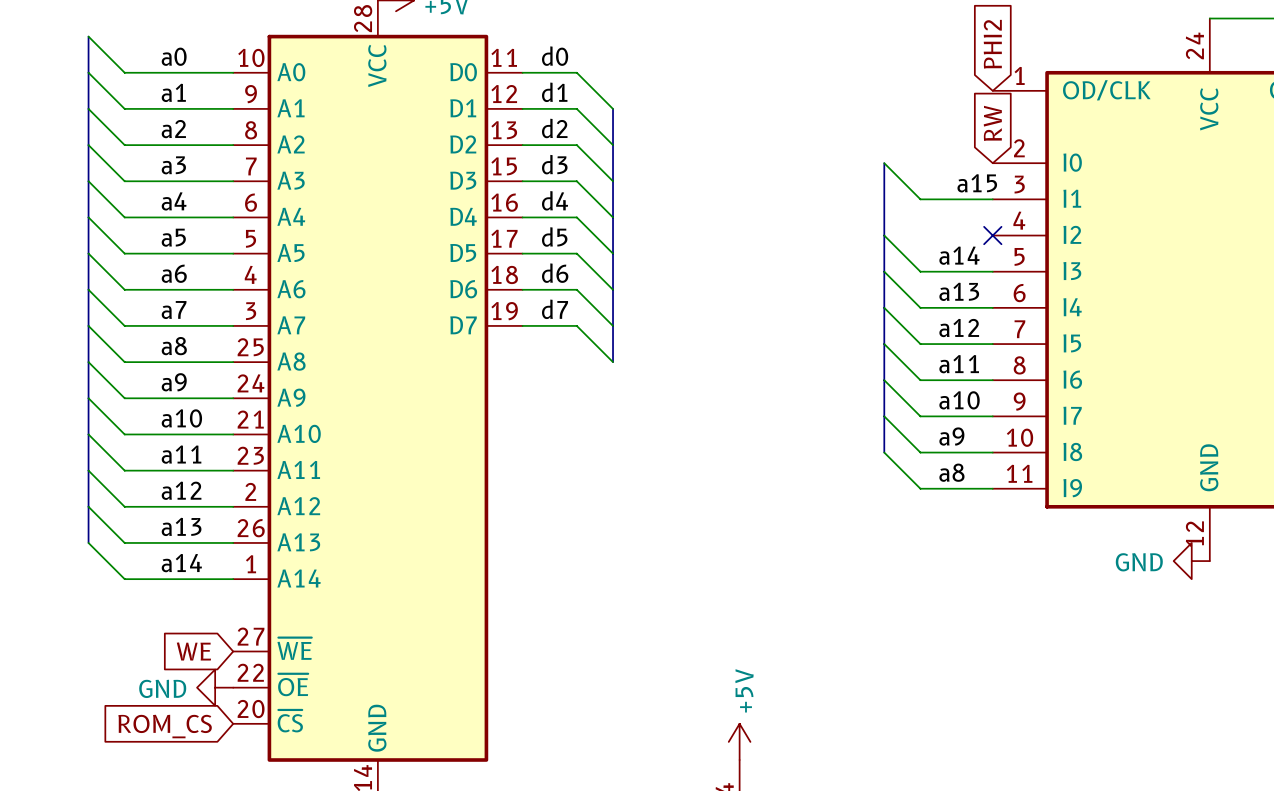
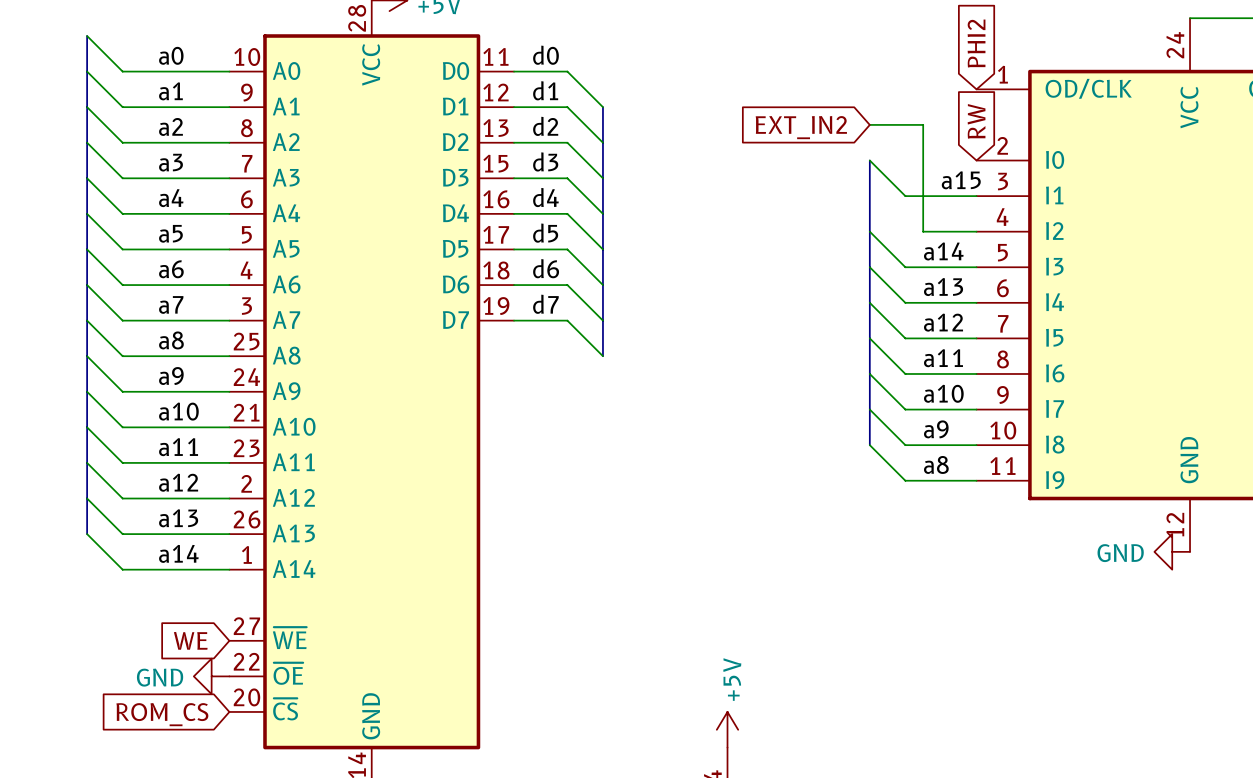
wire: none -> (869, 124) (923, 124) (923, 231) (976, 231)
global label: none -> EXT_IN2 (801, 127)
no-connect mark: (992, 235) -> none

